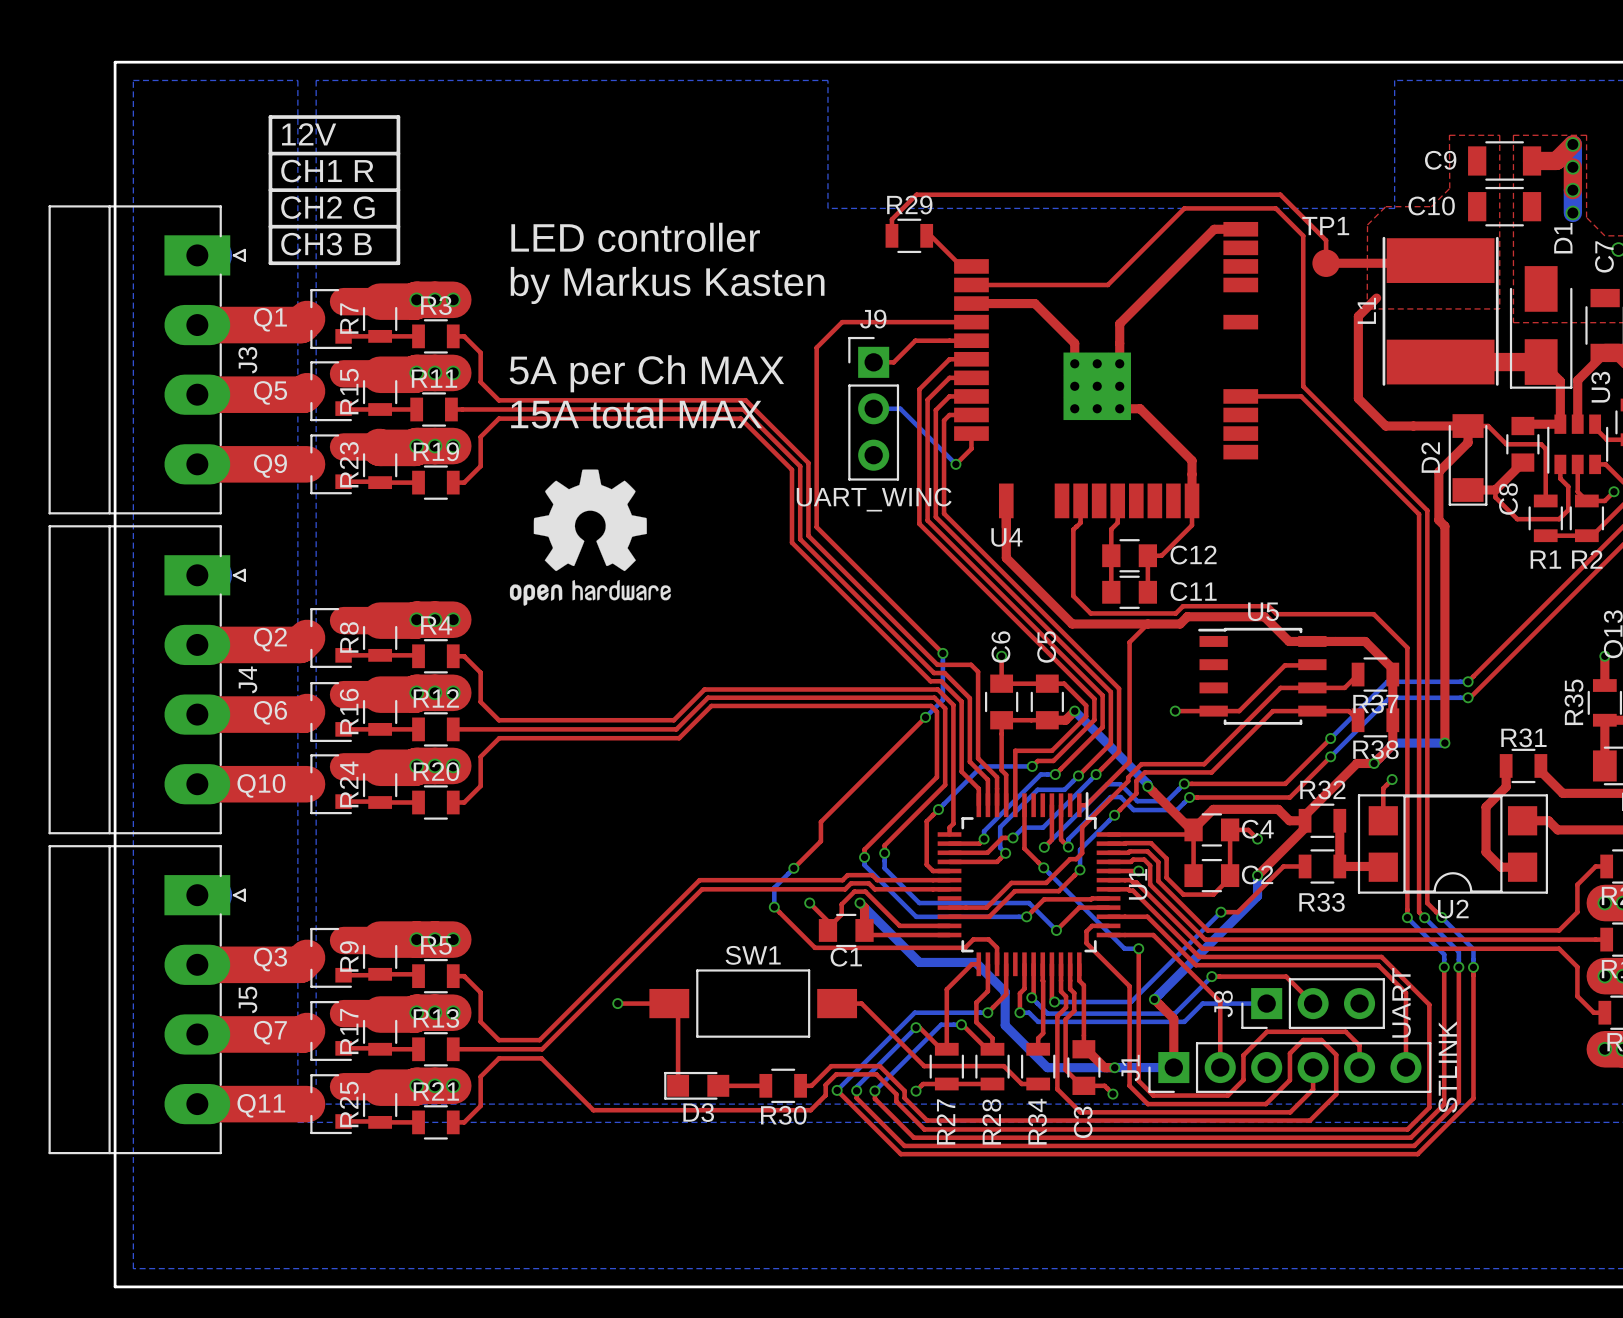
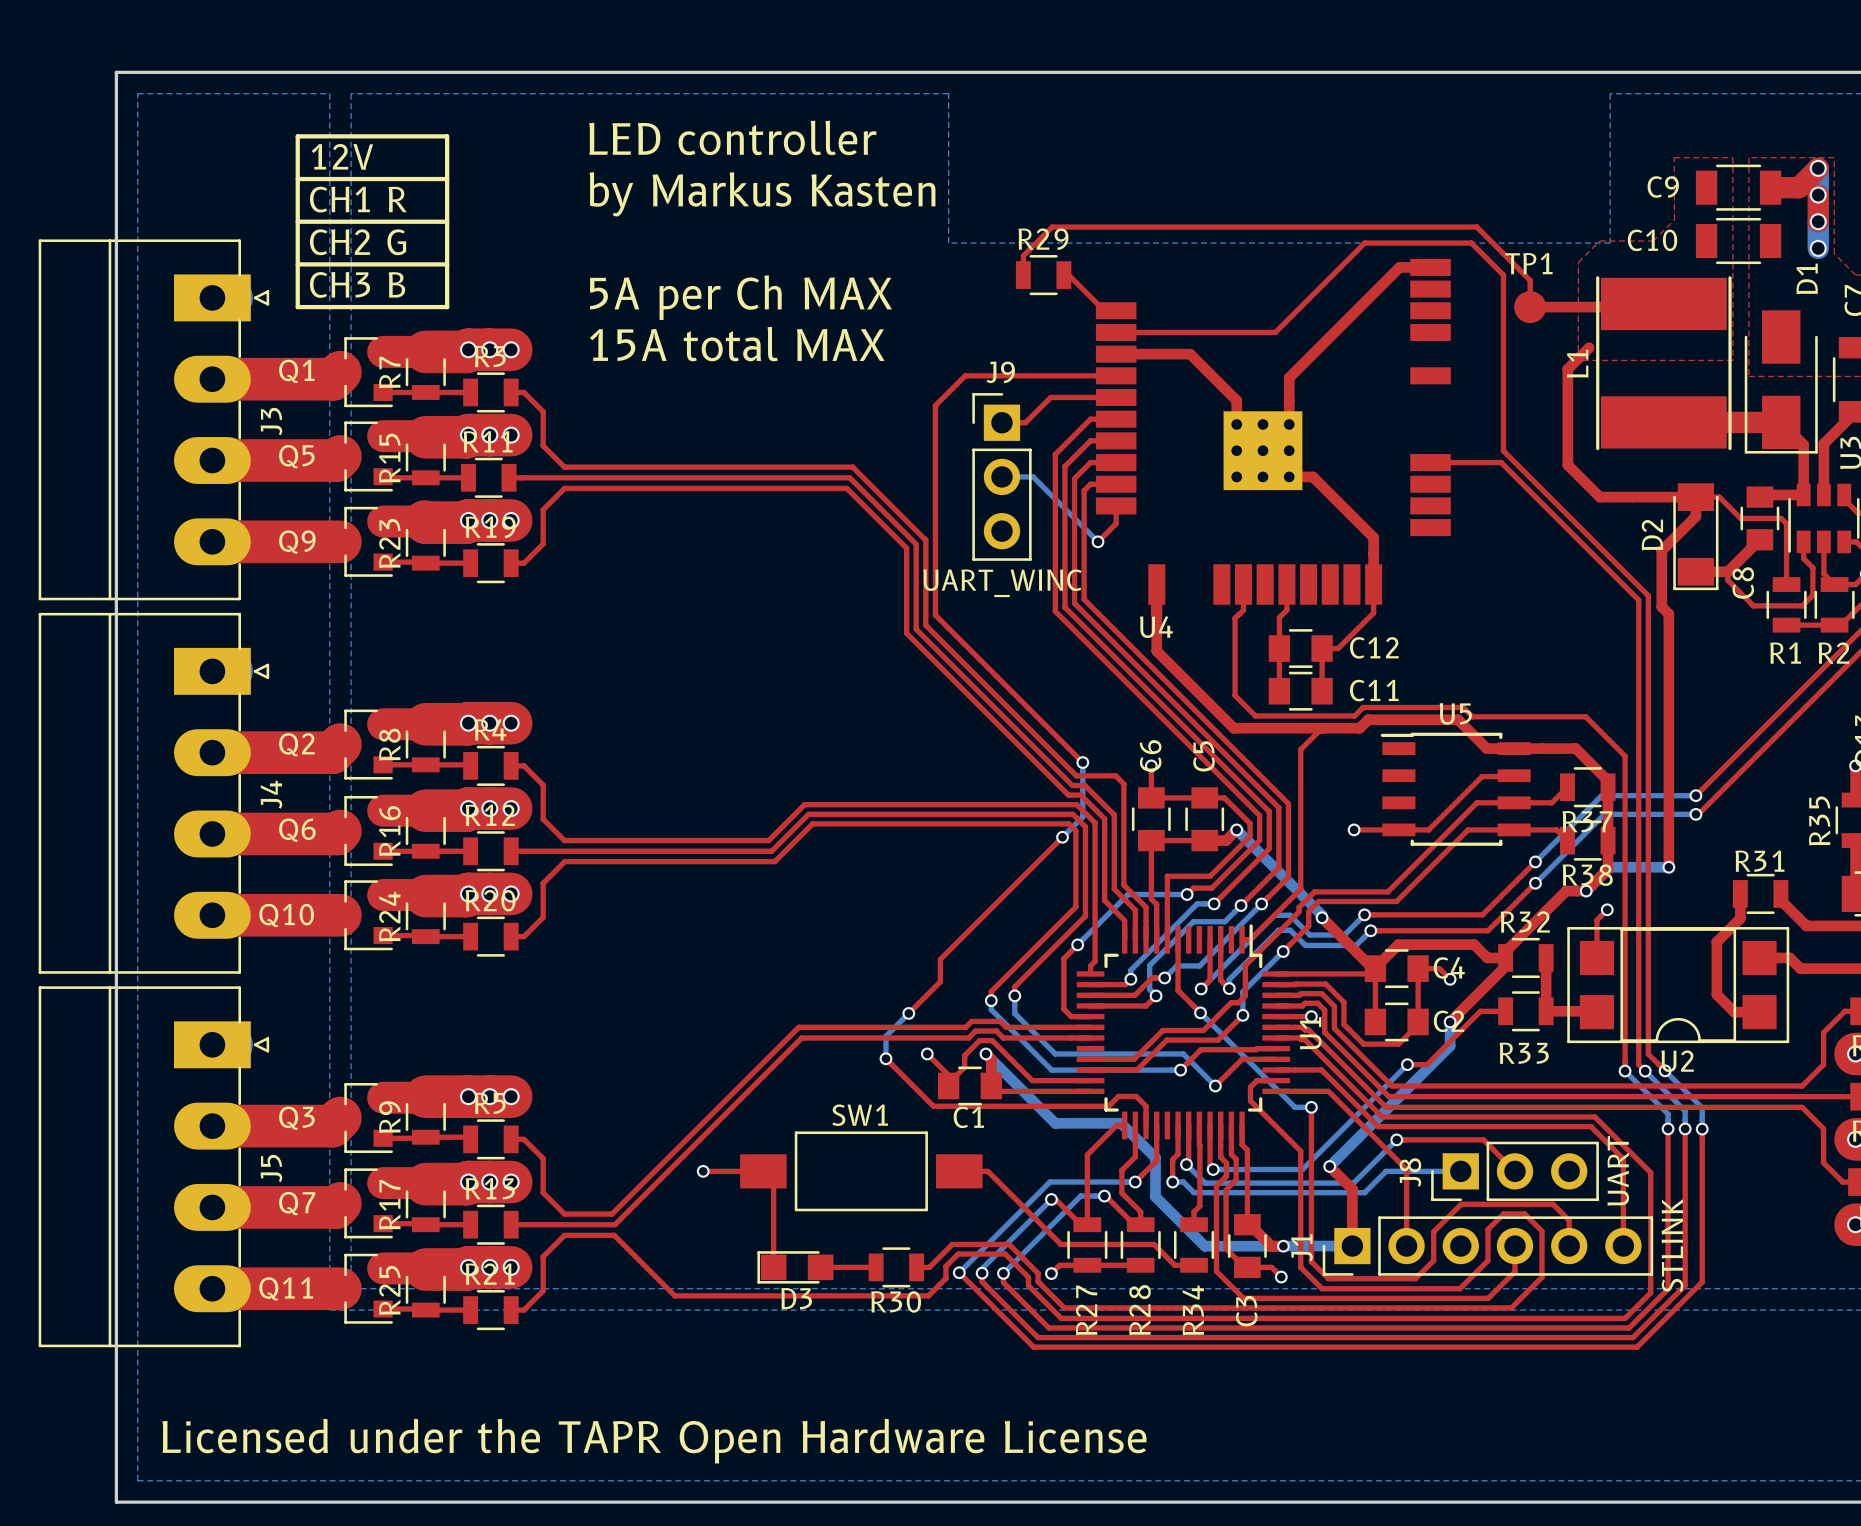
text position: LED controller (635, 237) -> LED controller (732, 137)
text position: by Markus Kasten (667, 285) -> by Markus Kasten (762, 194)
text position: 5A per Ch MAX (646, 373) -> 5A per Ch MAX (740, 297)
text position: 15A total MAX (636, 413) -> 15A total MAX (737, 344)
drawing: [509, 469, 671, 606] -> none
text: none -> Licensed under the TAPR Open Hardware License (654, 1441)

